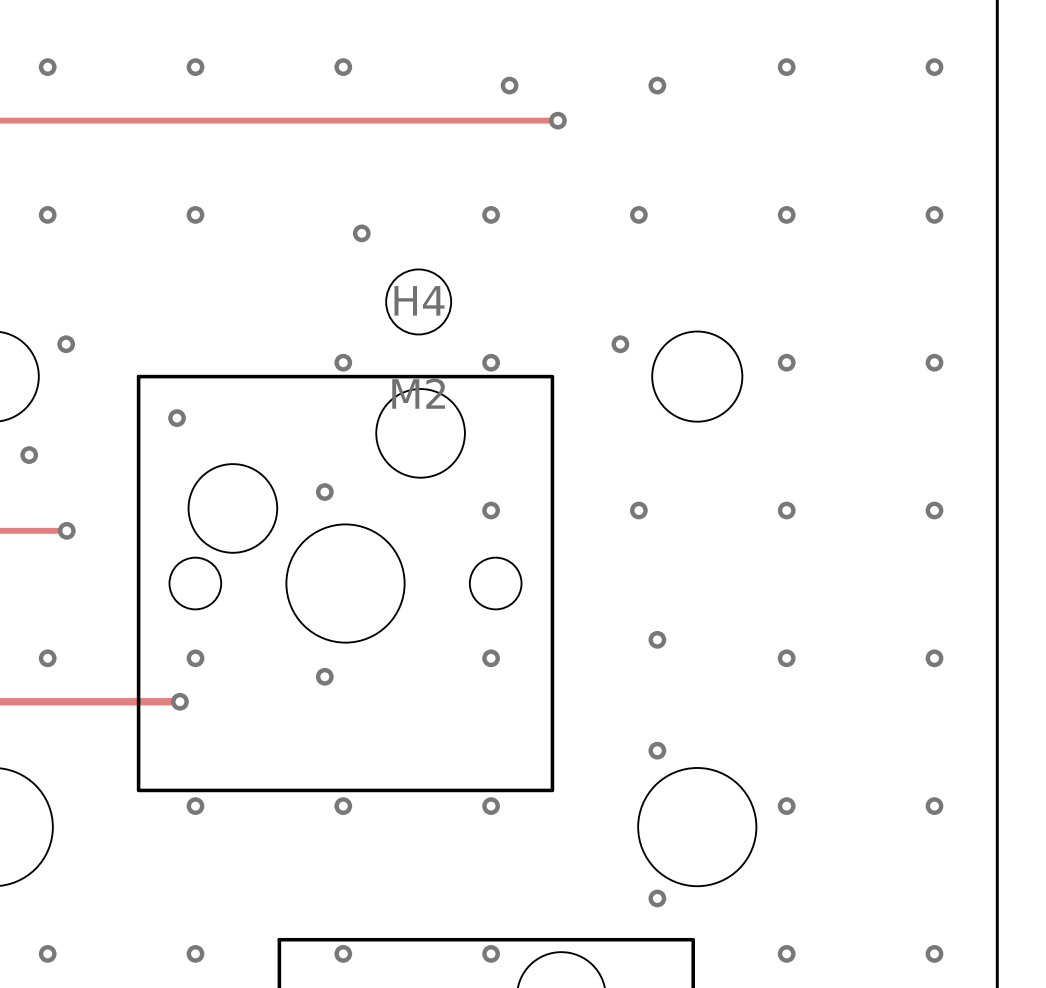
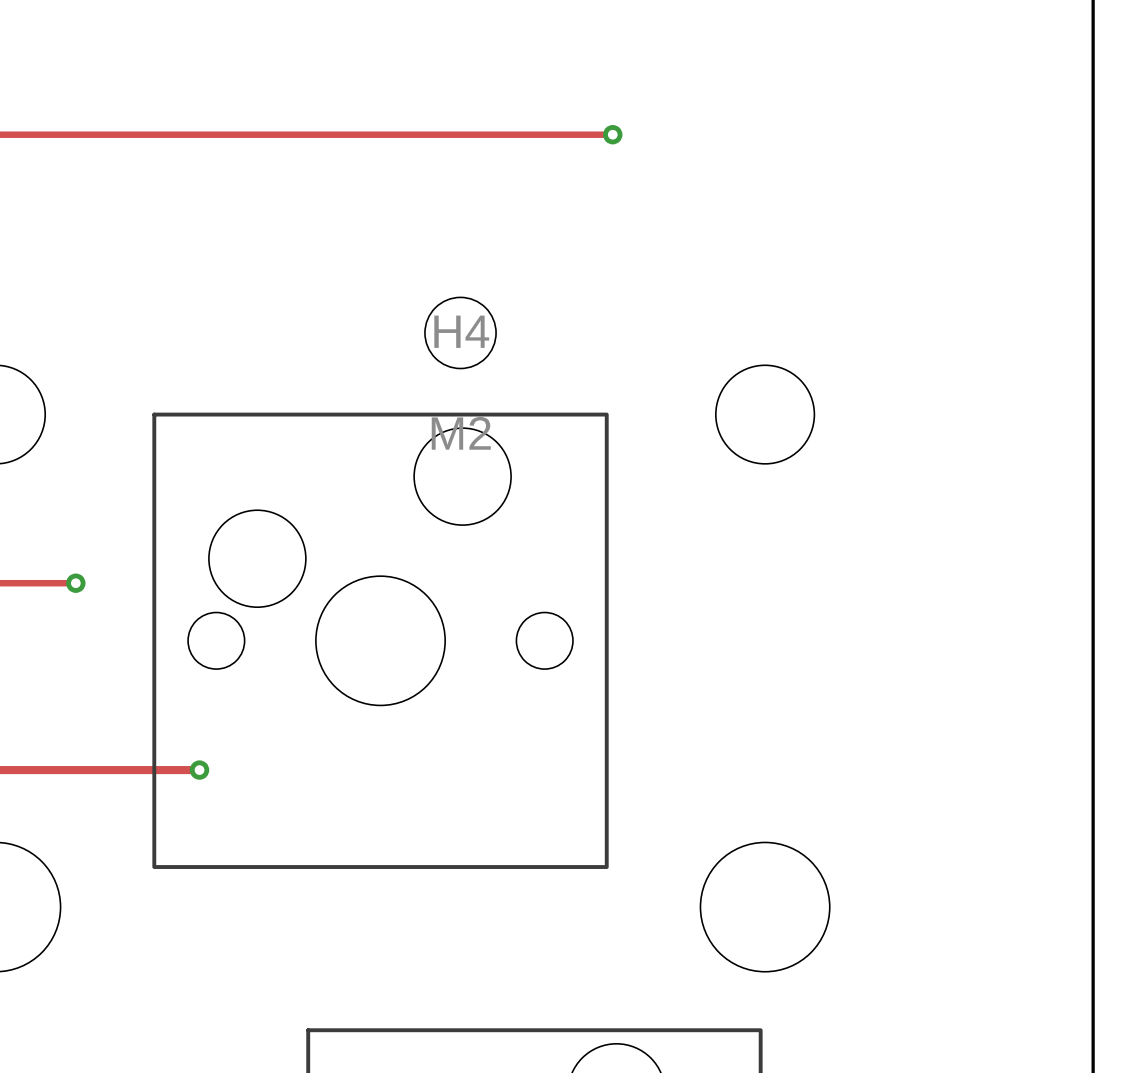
via: (47, 67) -> none
via: (195, 67) -> none
via: (343, 67) -> none
via: (786, 67) -> none
via: (934, 67) -> none
via: (509, 85) -> none
via: (657, 85) -> none
via: (47, 214) -> none
via: (195, 214) -> none
via: (491, 214) -> none
via: (638, 214) -> none
via: (786, 214) -> none
via: (934, 214) -> none
via: (361, 233) -> none
via: (66, 344) -> none
via: (620, 344) -> none
via: (343, 362) -> none
via: (491, 362) -> none
via: (786, 362) -> none
via: (934, 362) -> none
via: (177, 418) -> none
via: (29, 455) -> none
via: (324, 492) -> none
via: (491, 510) -> none
via: (638, 510) -> none
via: (786, 510) -> none
via: (934, 510) -> none
via: (657, 639) -> none
via: (47, 658) -> none
via: (195, 658) -> none
via: (491, 658) -> none
via: (786, 658) -> none
via: (934, 658) -> none
via: (324, 676) -> none
via: (657, 750) -> none
via: (195, 806) -> none
via: (343, 806) -> none
via: (491, 806) -> none
via: (786, 806) -> none
via: (934, 806) -> none
via: (657, 898) -> none
via: (47, 953) -> none
via: (195, 953) -> none
via: (343, 953) -> none
via: (491, 953) -> none
via: (786, 953) -> none
via: (934, 953) -> none

